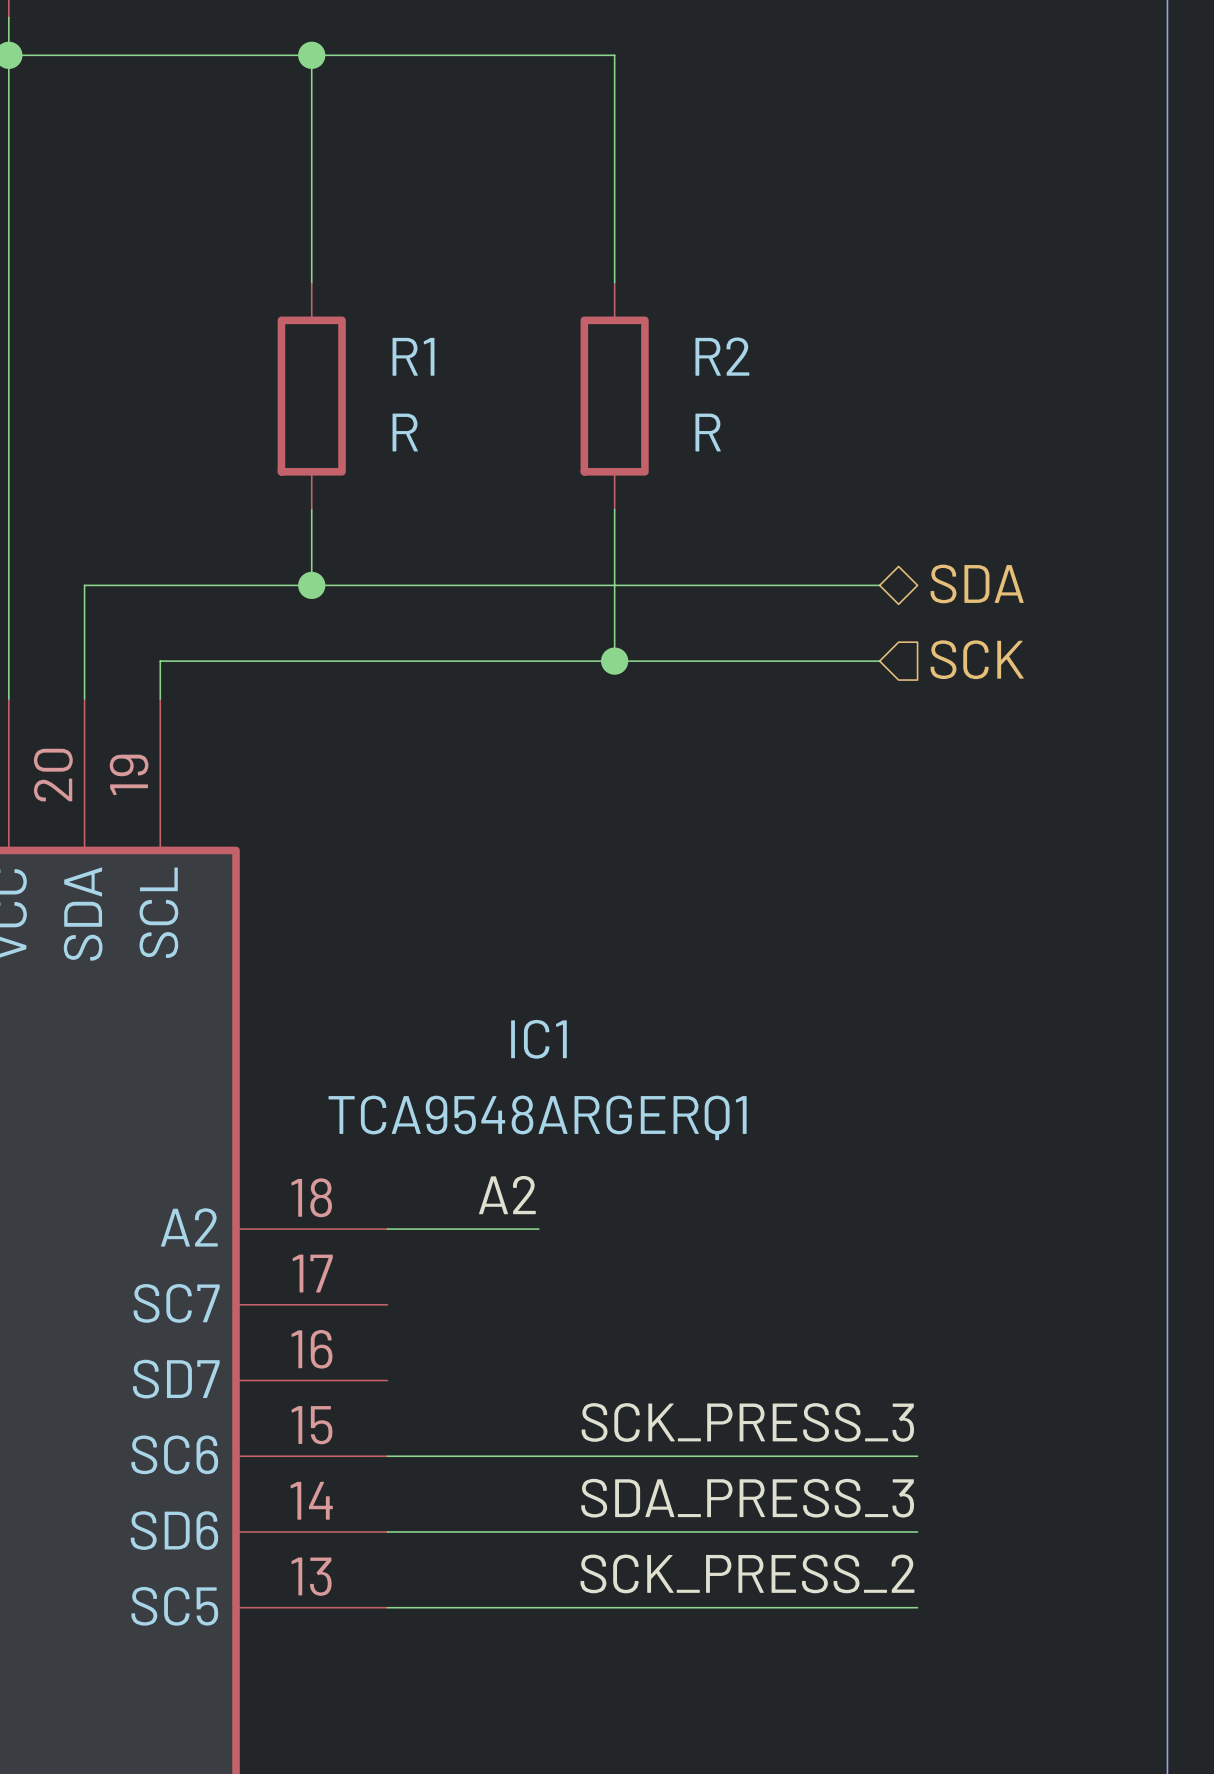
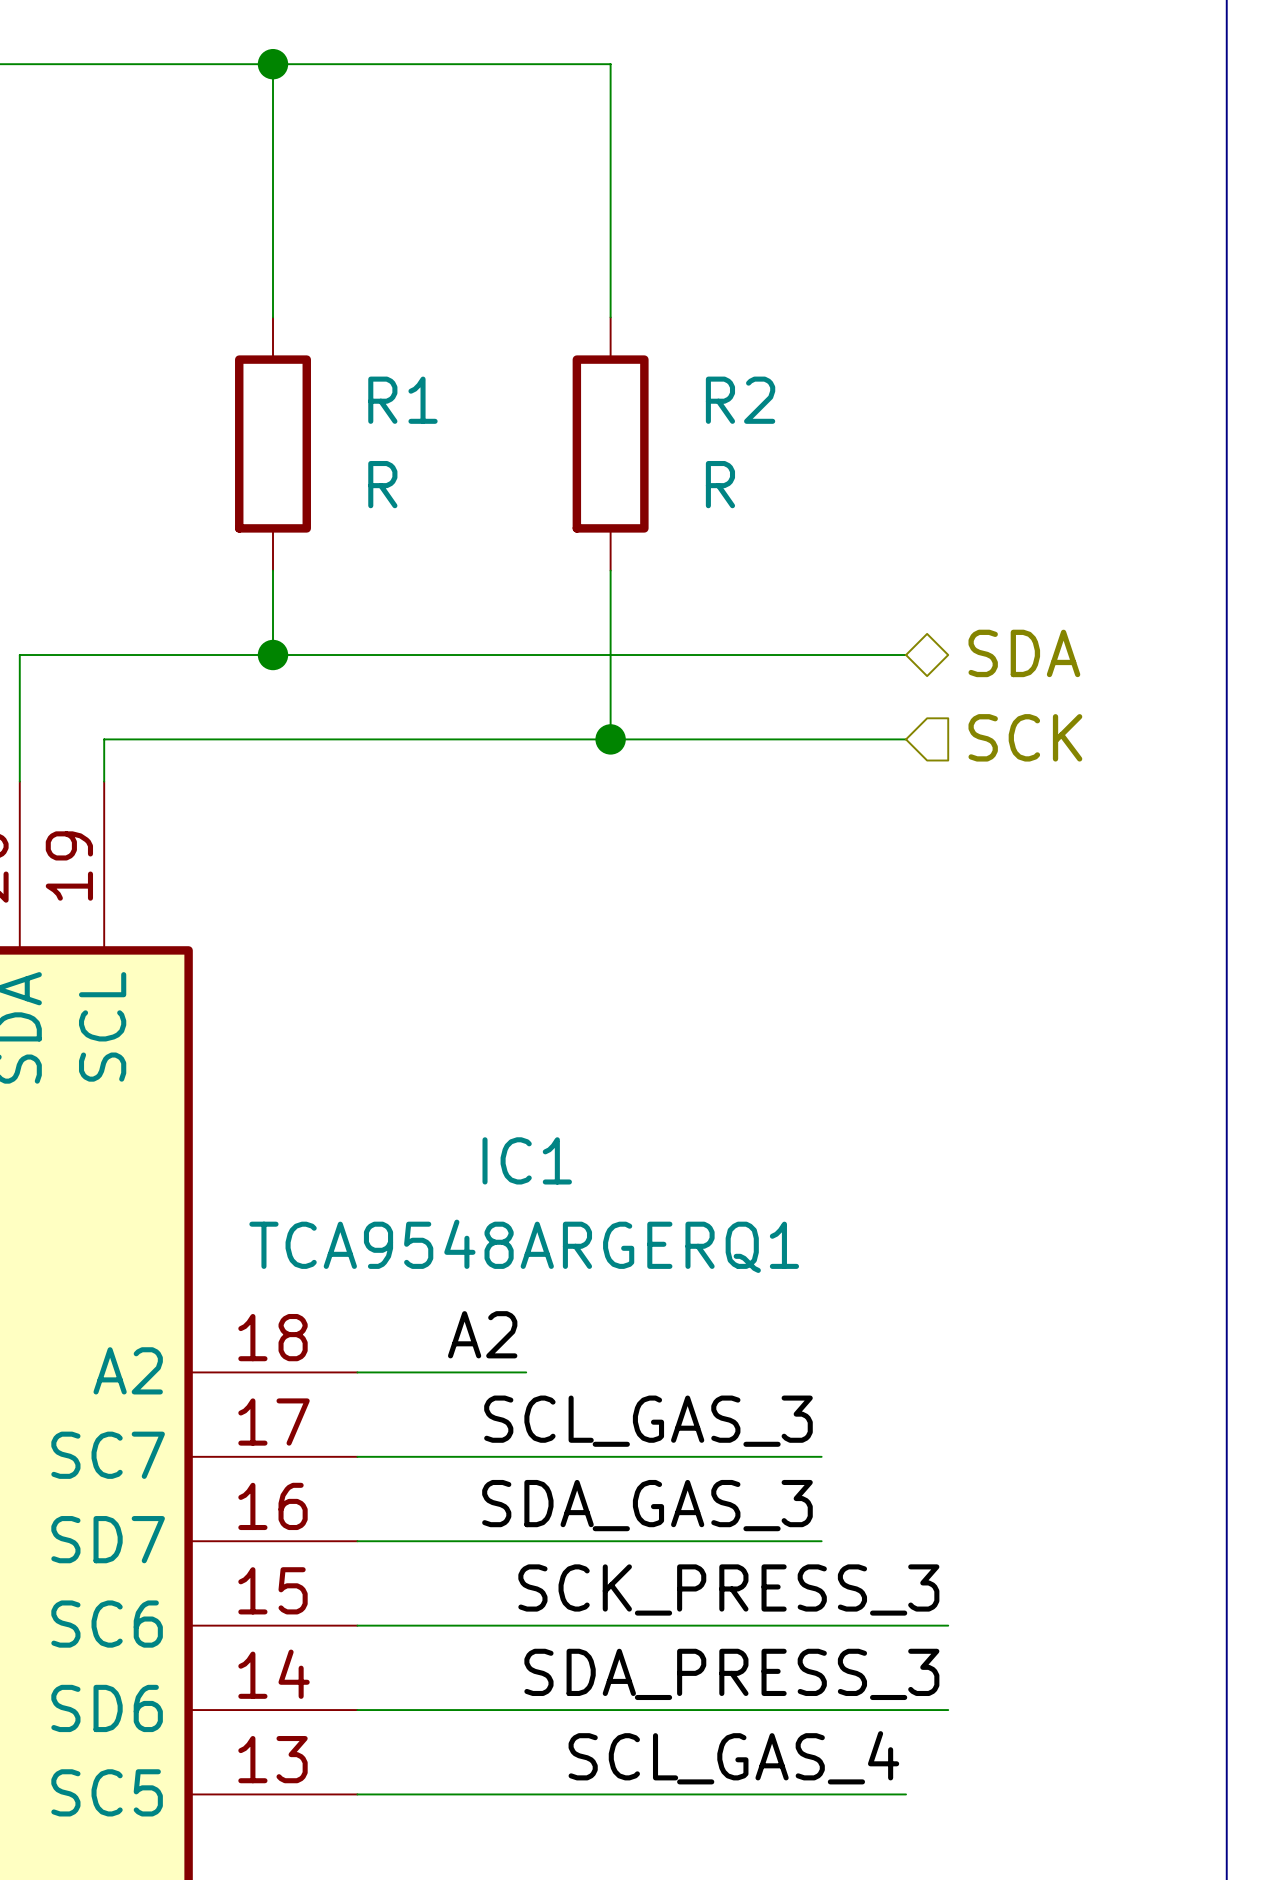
label: none -> SCL_GAS_3 (648, 1421)
wire: none -> (357, 1456) (821, 1456)
label: none -> SDA_GAS_3 (647, 1505)
wire: none -> (357, 1541) (821, 1541)
label: none -> SCL_GAS_4 (733, 1757)
label: SCK_PRESS_2 (747, 1573) -> none
wire: (879, 1607) (917, 1607) -> none

